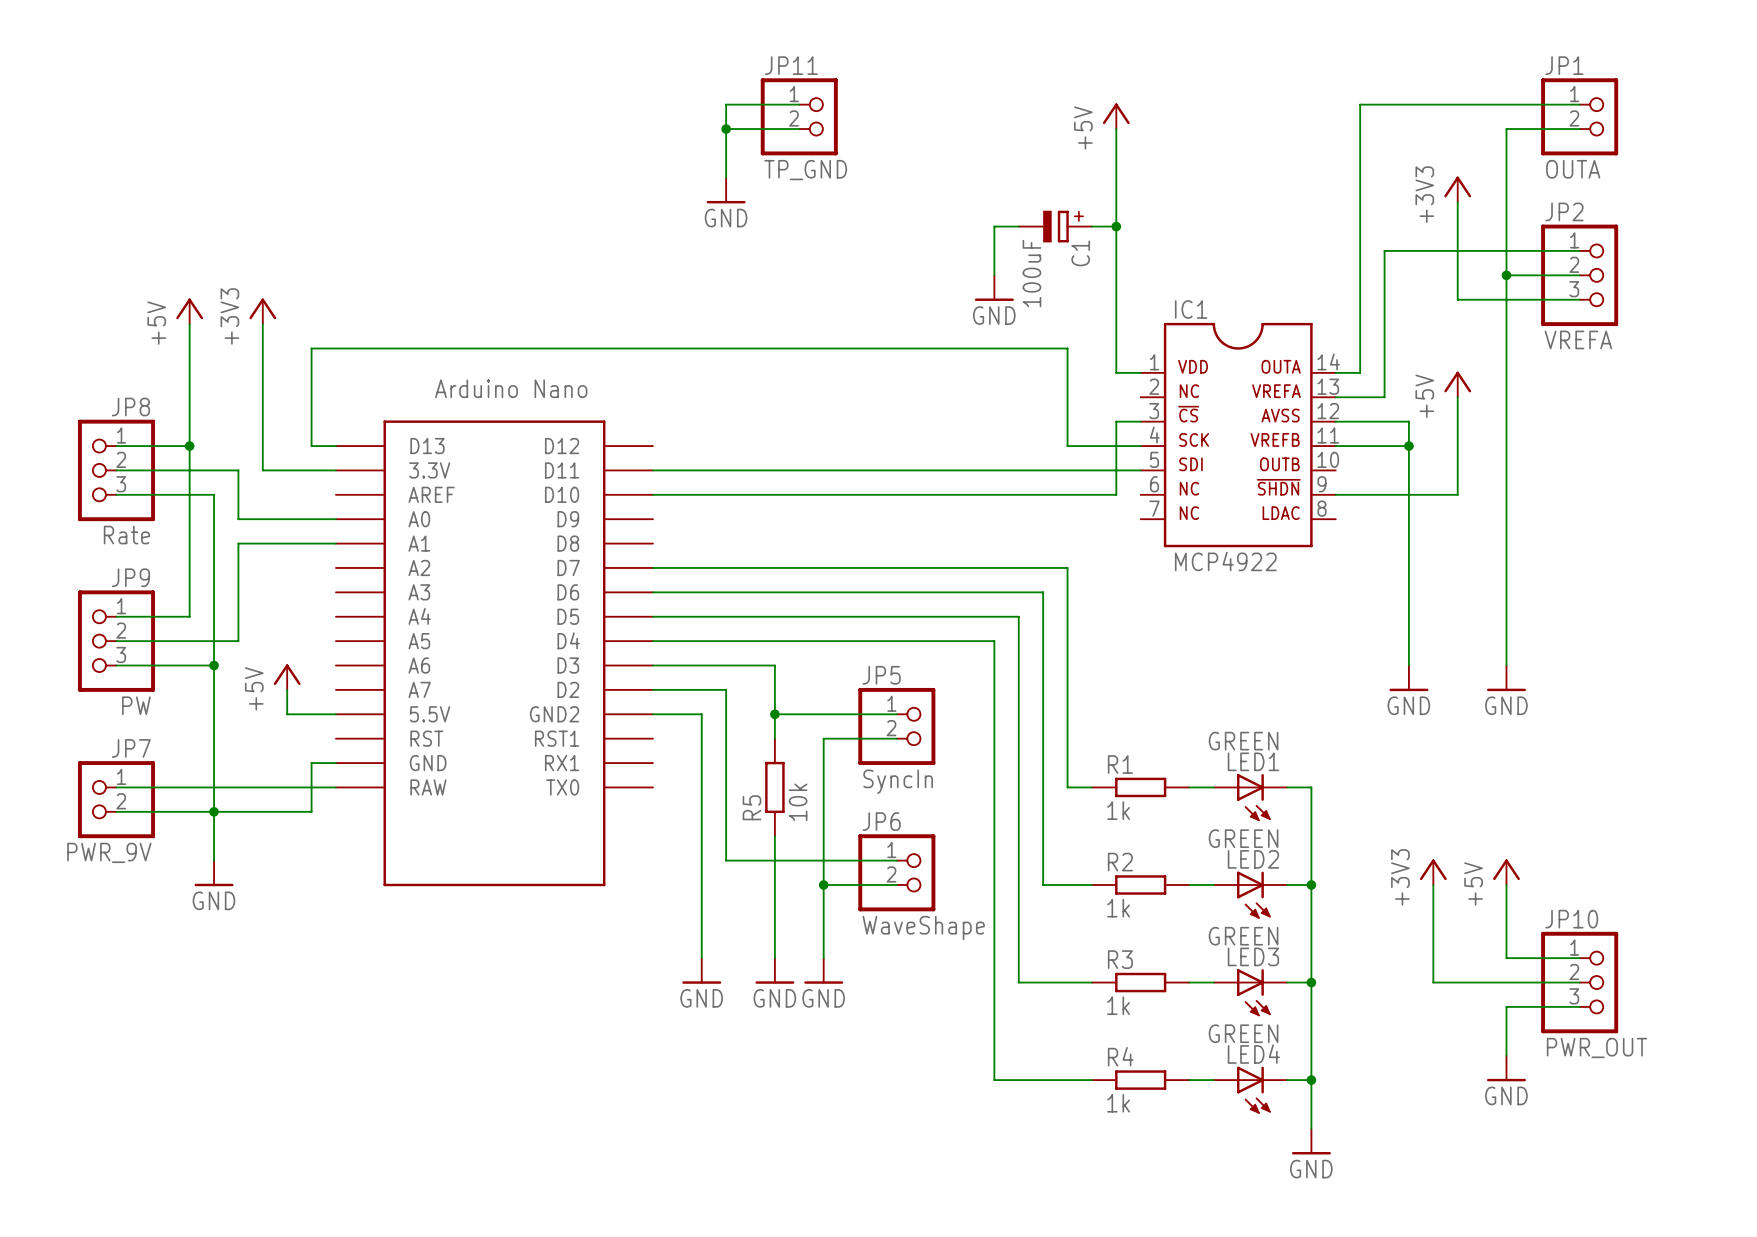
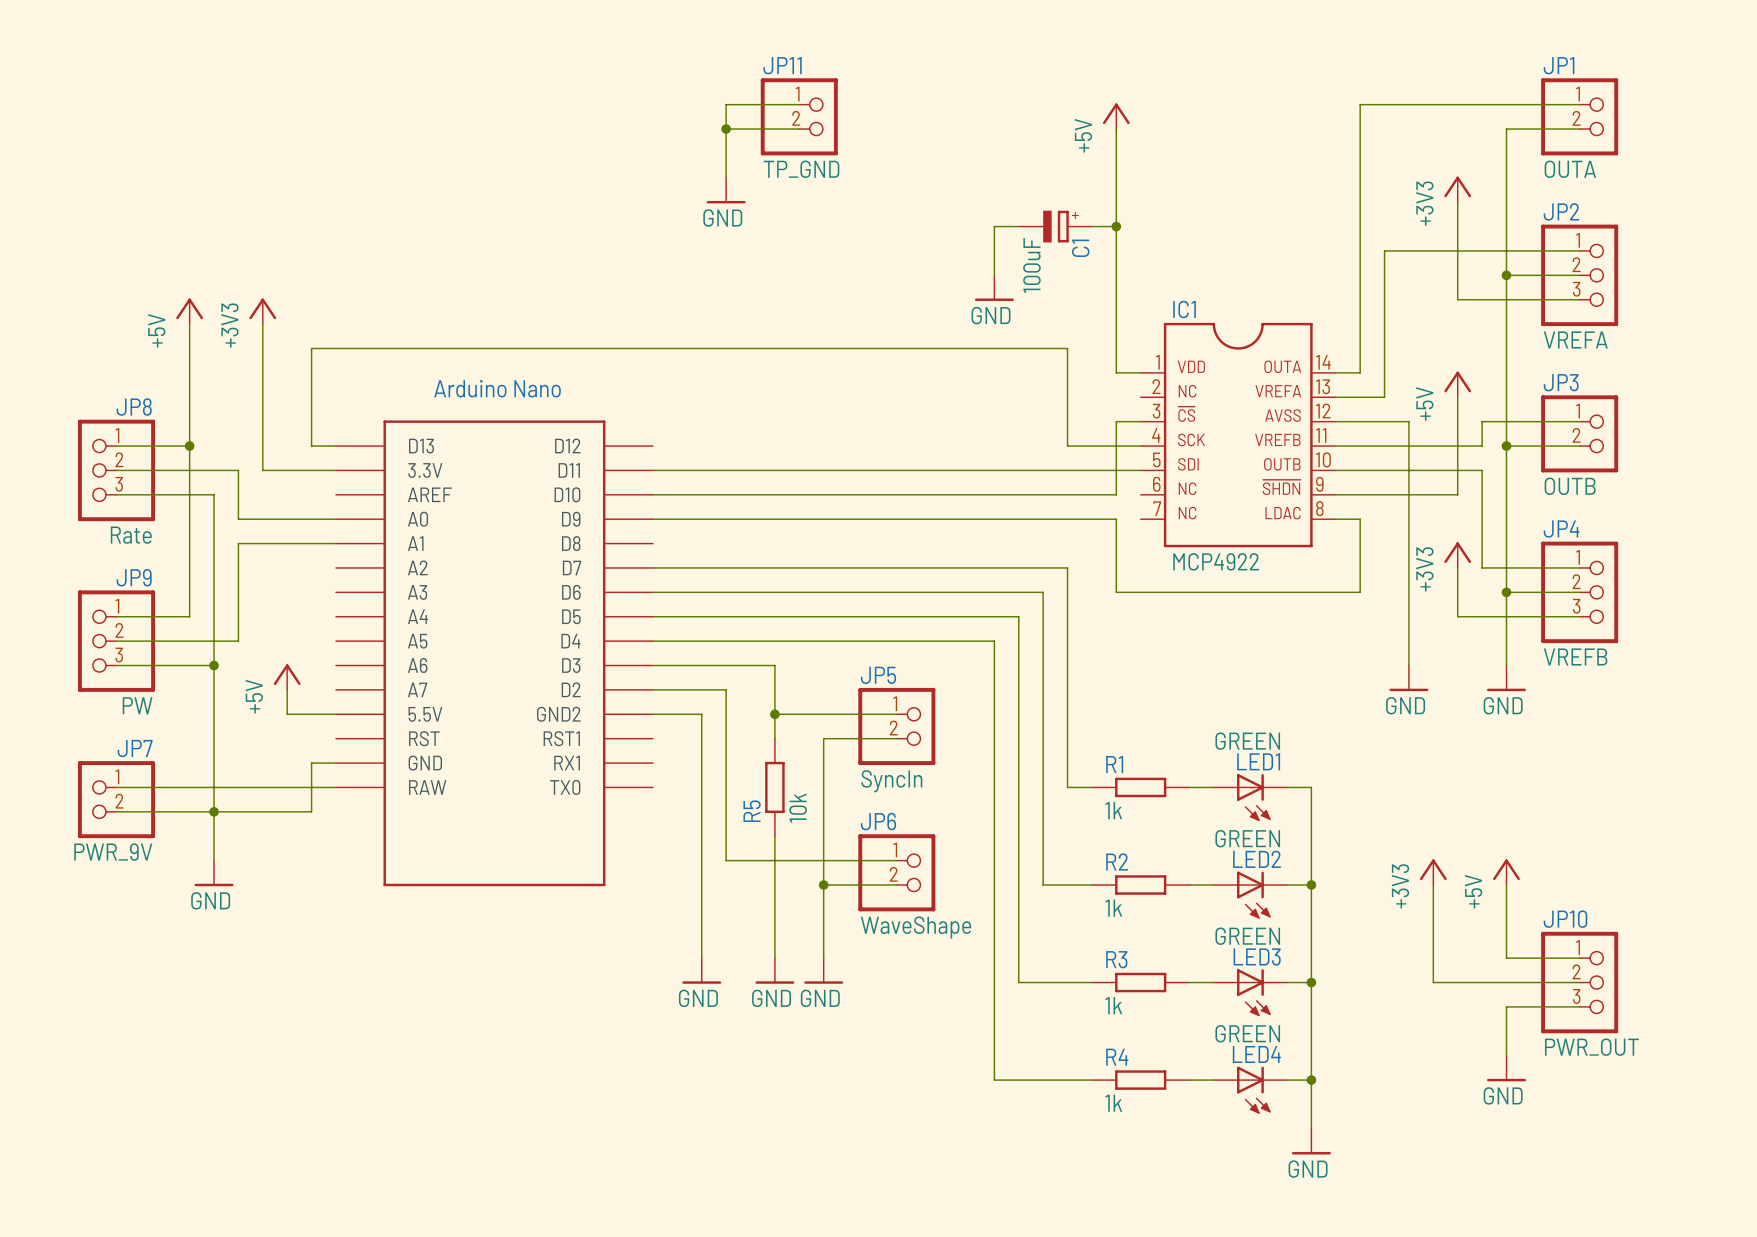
wire: none -> (1579, 421) (1482, 421) (1482, 446) (1408, 446)
JP3: none -> OUTB (1579, 433)
junction: (1408, 446) -> none
wire: none -> (1506, 446) (1579, 446)
junction: none -> (1506, 446)
wire: none -> (1335, 470) (1482, 470) (1482, 567) (1579, 567)
wire: none -> (652, 519) (1116, 519) (1116, 592) (1360, 592) (1360, 519) (1335, 519)
power symbol: none -> +3V3 (1457, 555)
wire: none -> (1457, 567) (1457, 616) (1579, 616)
wire: none -> (1506, 592) (1579, 592)
junction: none -> (1506, 592)
JP4: none -> VREFB (1579, 592)

